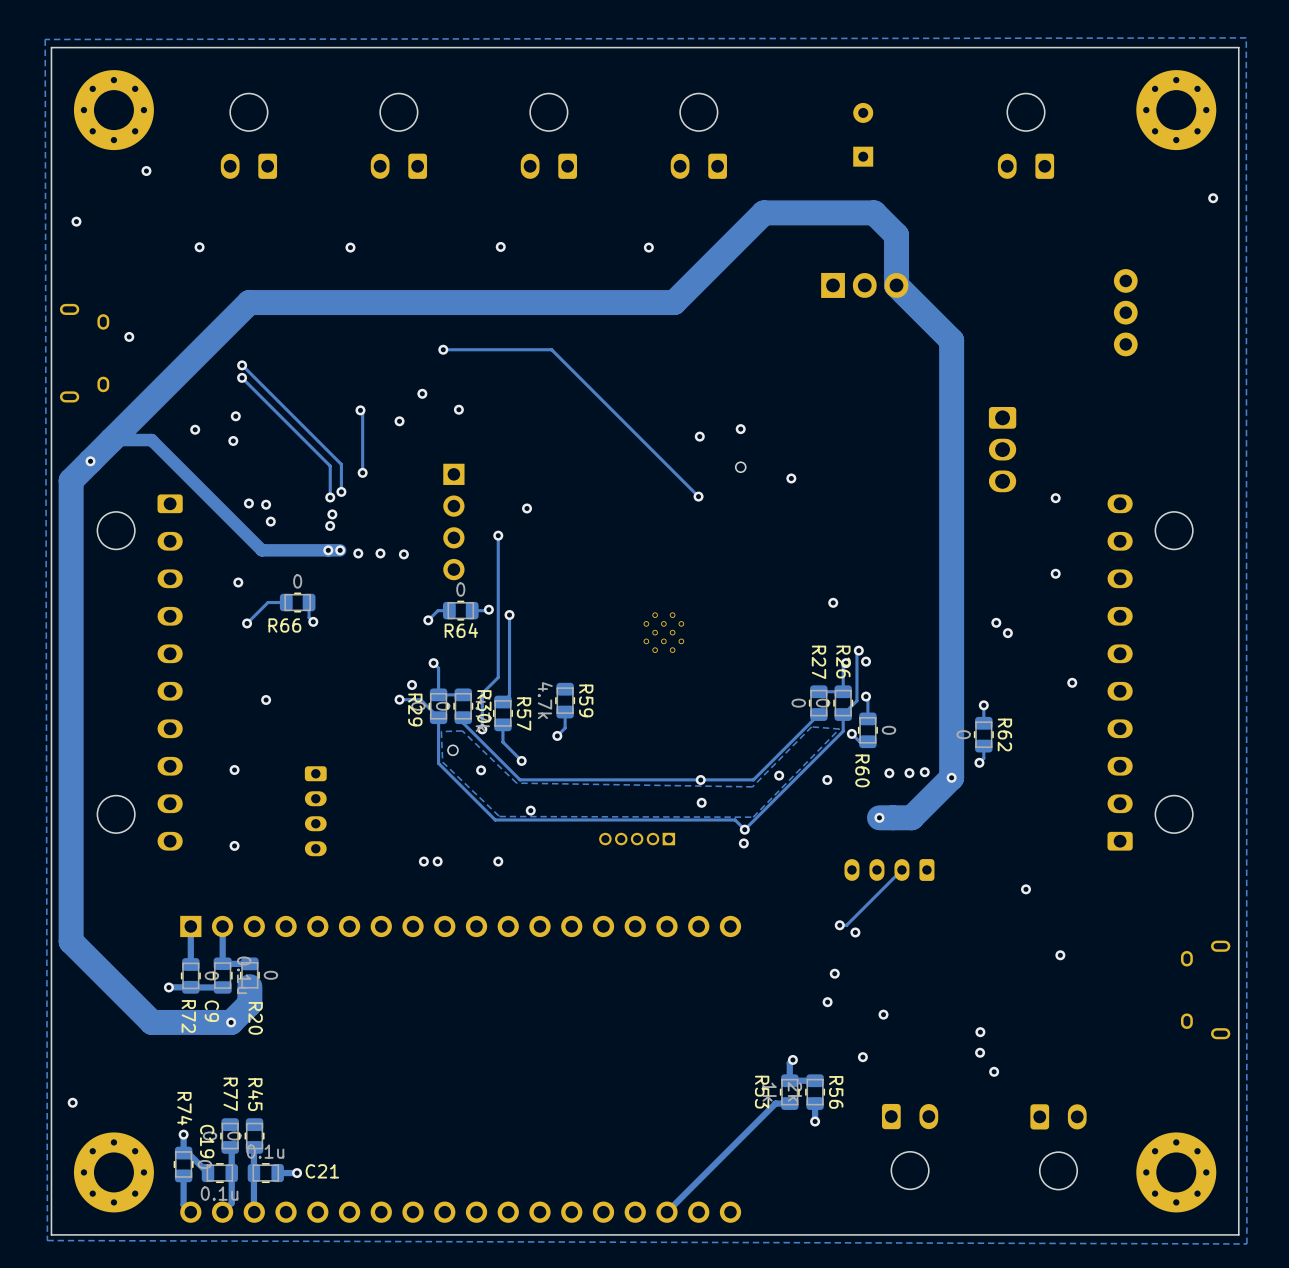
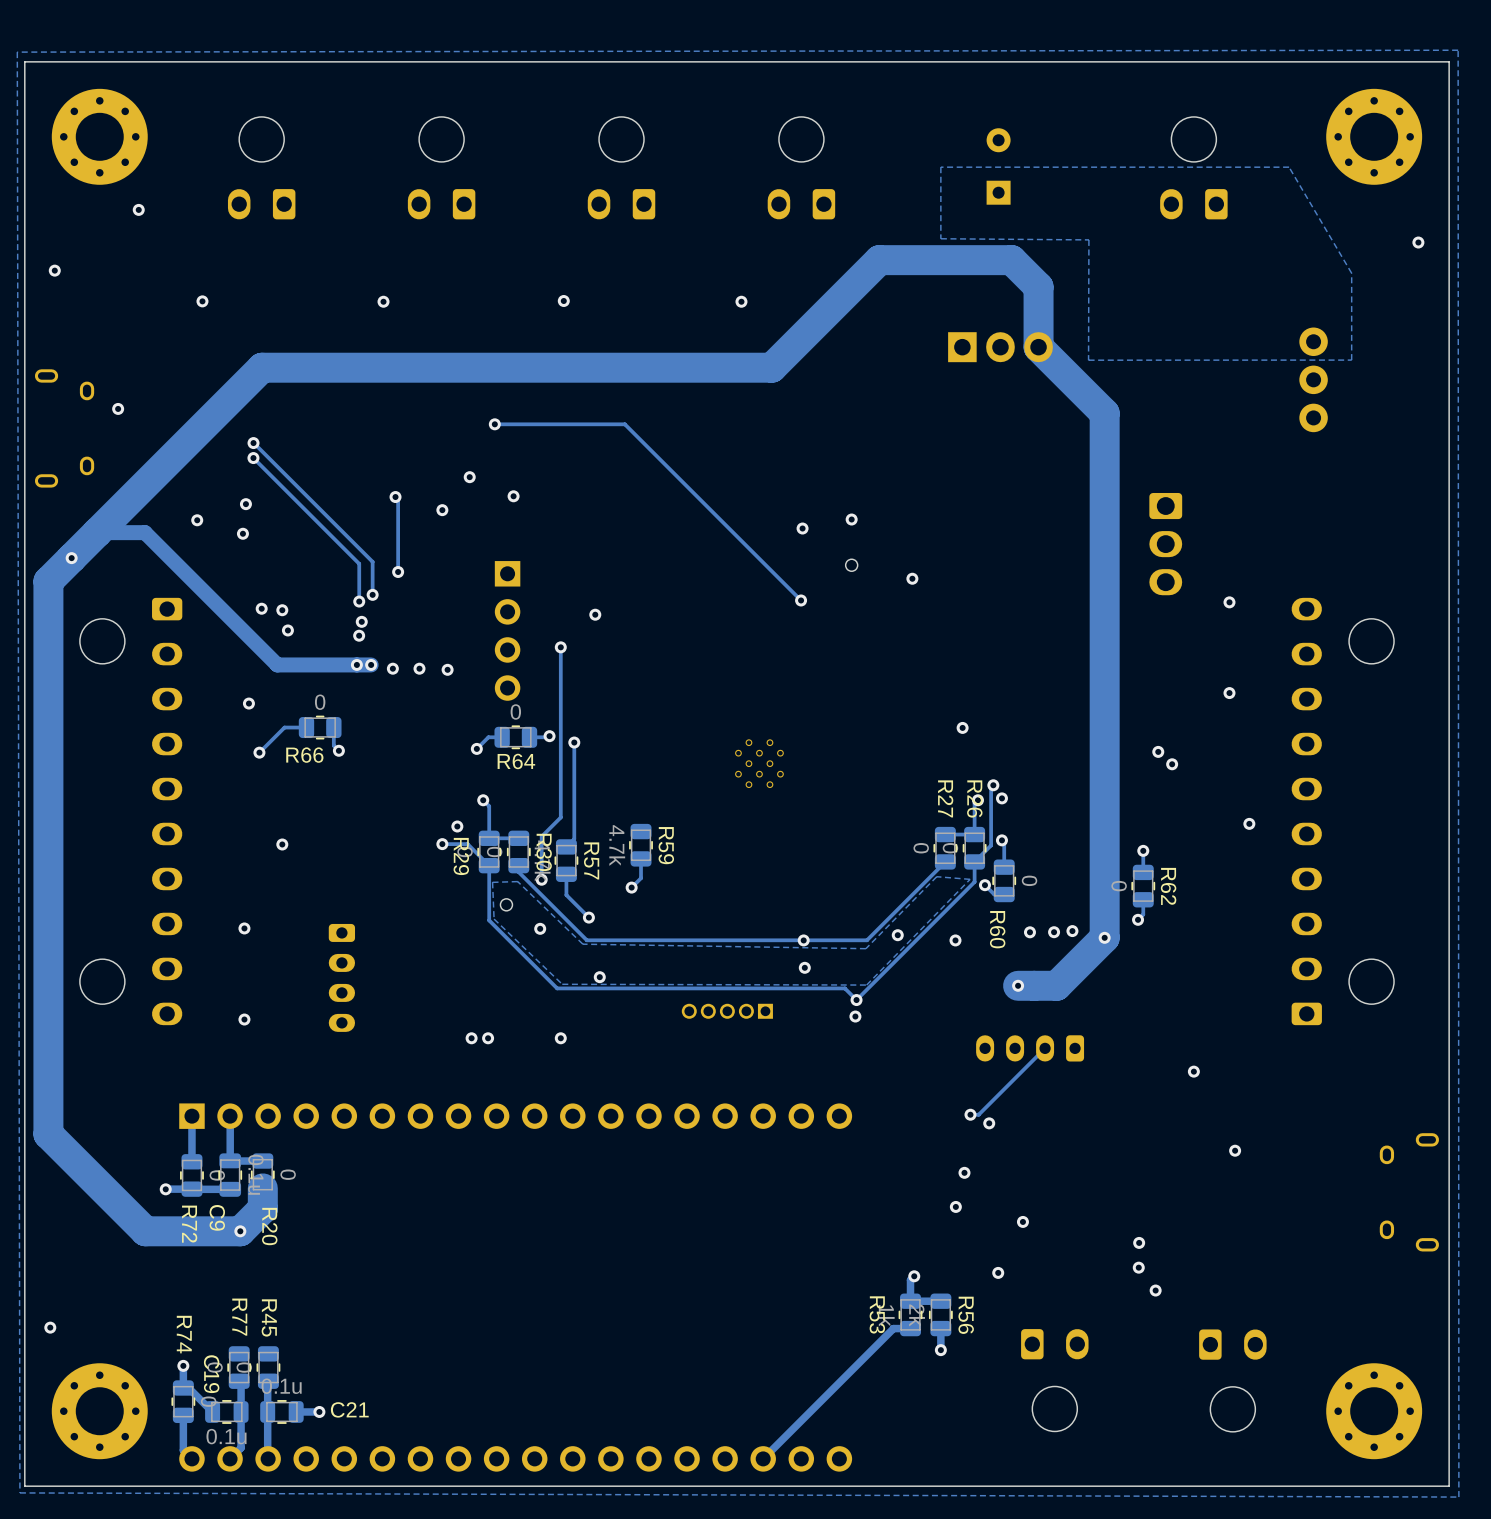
zone outline: none -> (1289, 167) (1351, 273) (1351, 360) (1088, 360) (1088, 239) (940, 238) (940, 167) (1289, 167)

